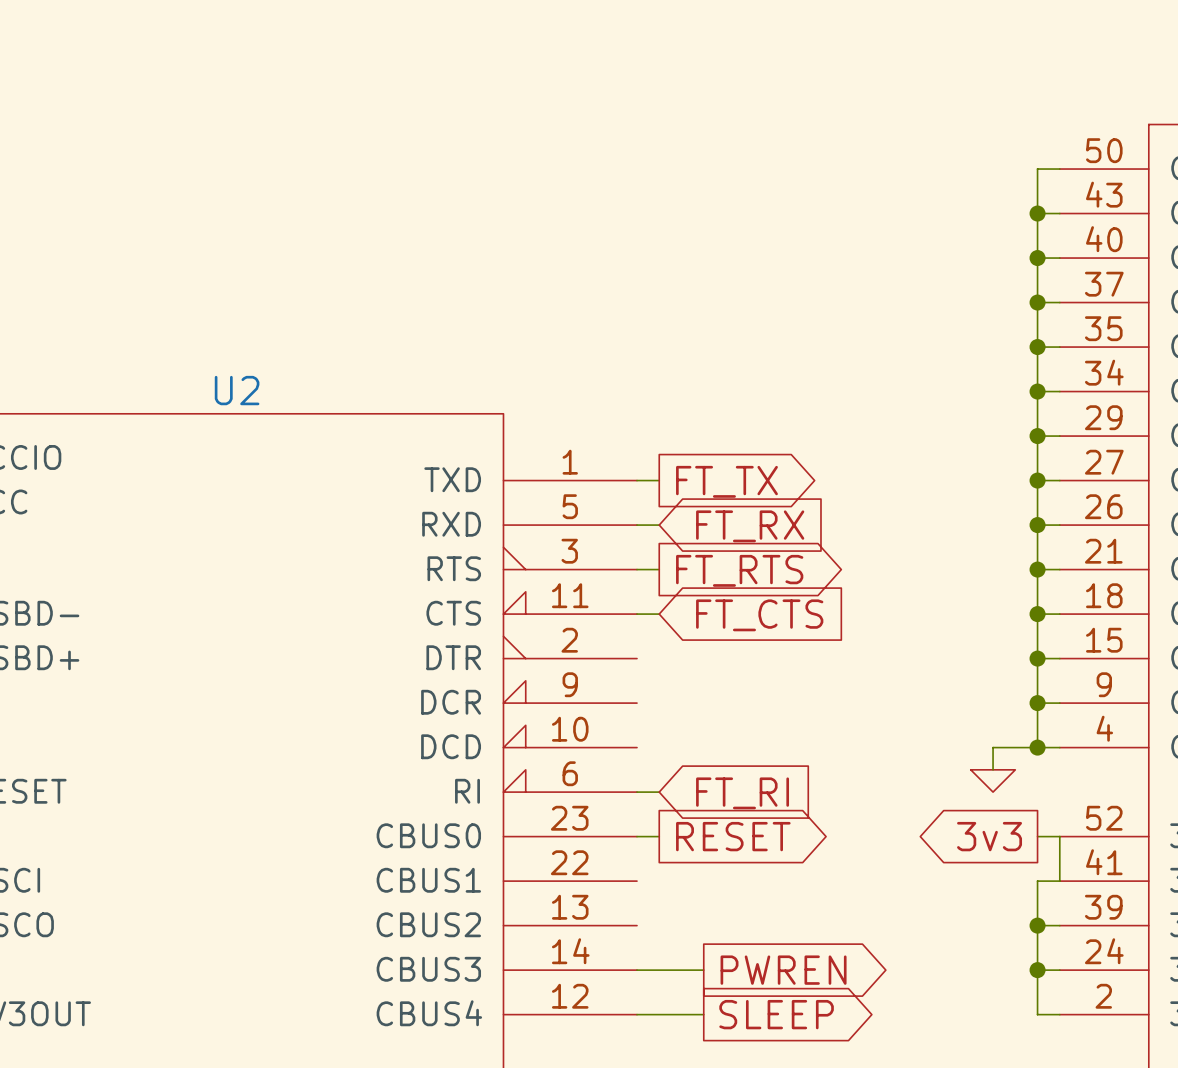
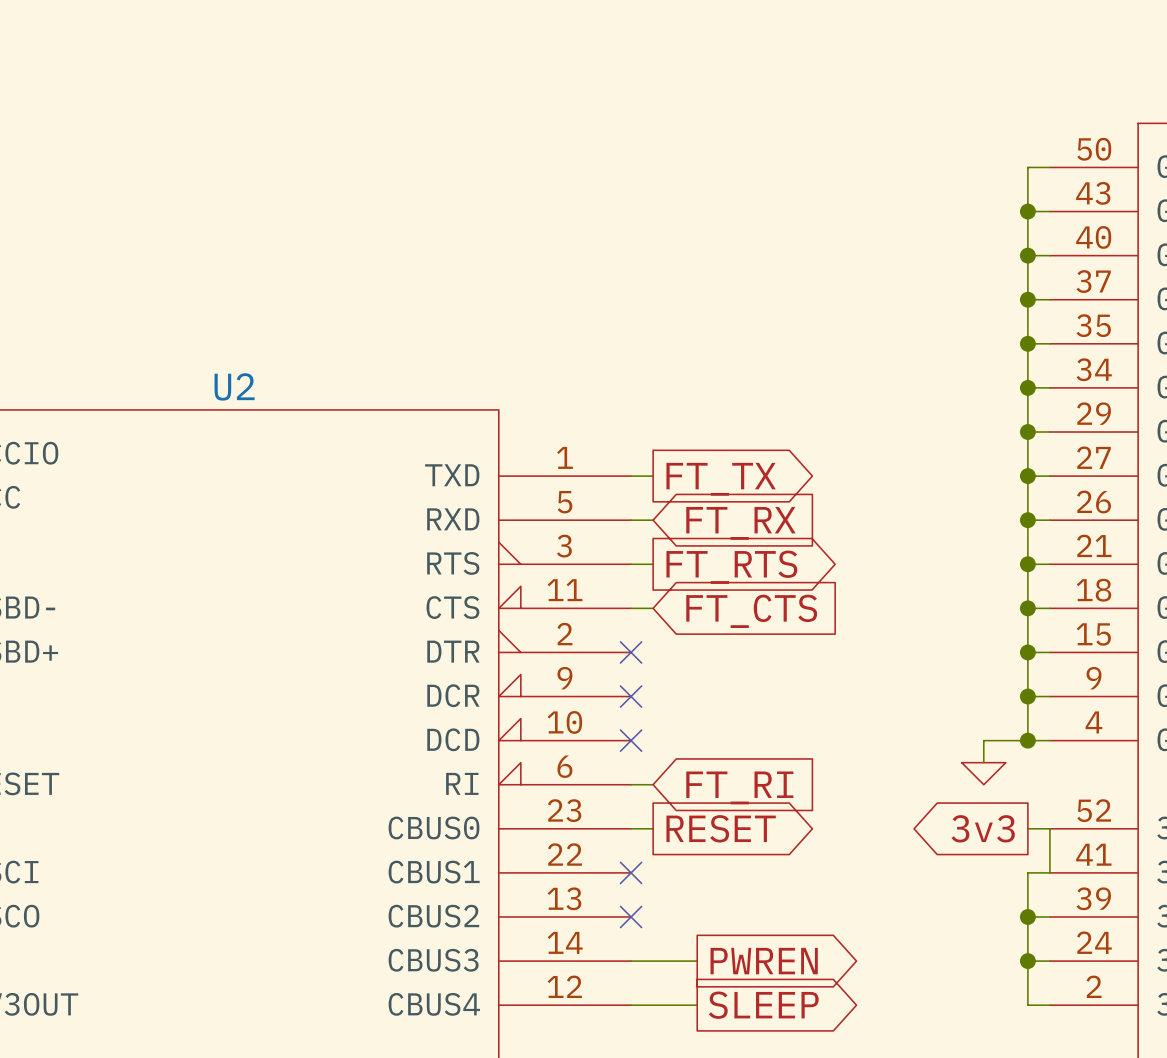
no-connect mark: none -> (631, 652)
no-connect mark: none -> (631, 696)
no-connect mark: none -> (631, 740)
no-connect mark: none -> (631, 872)
no-connect mark: none -> (631, 917)

